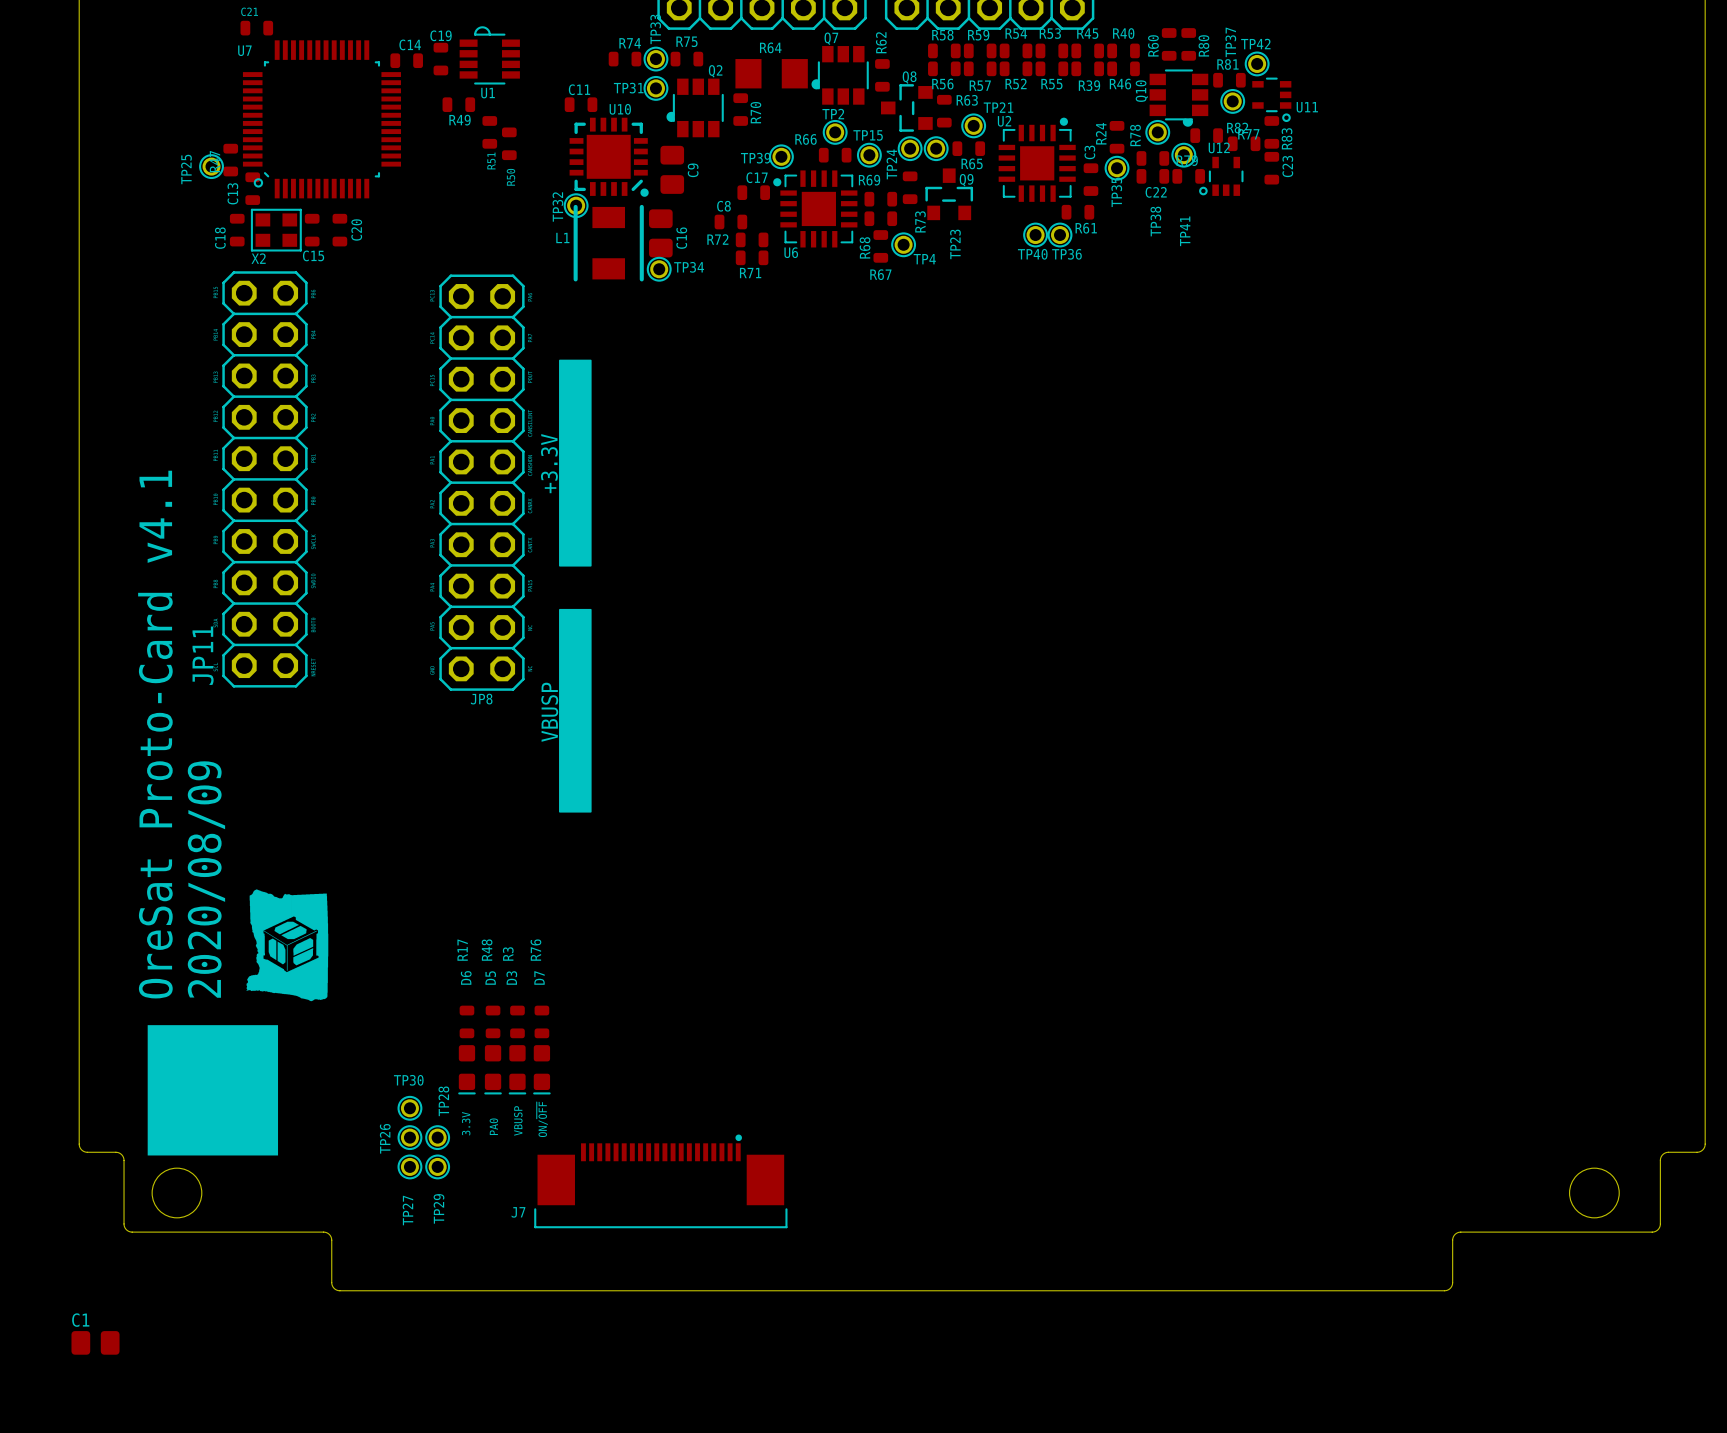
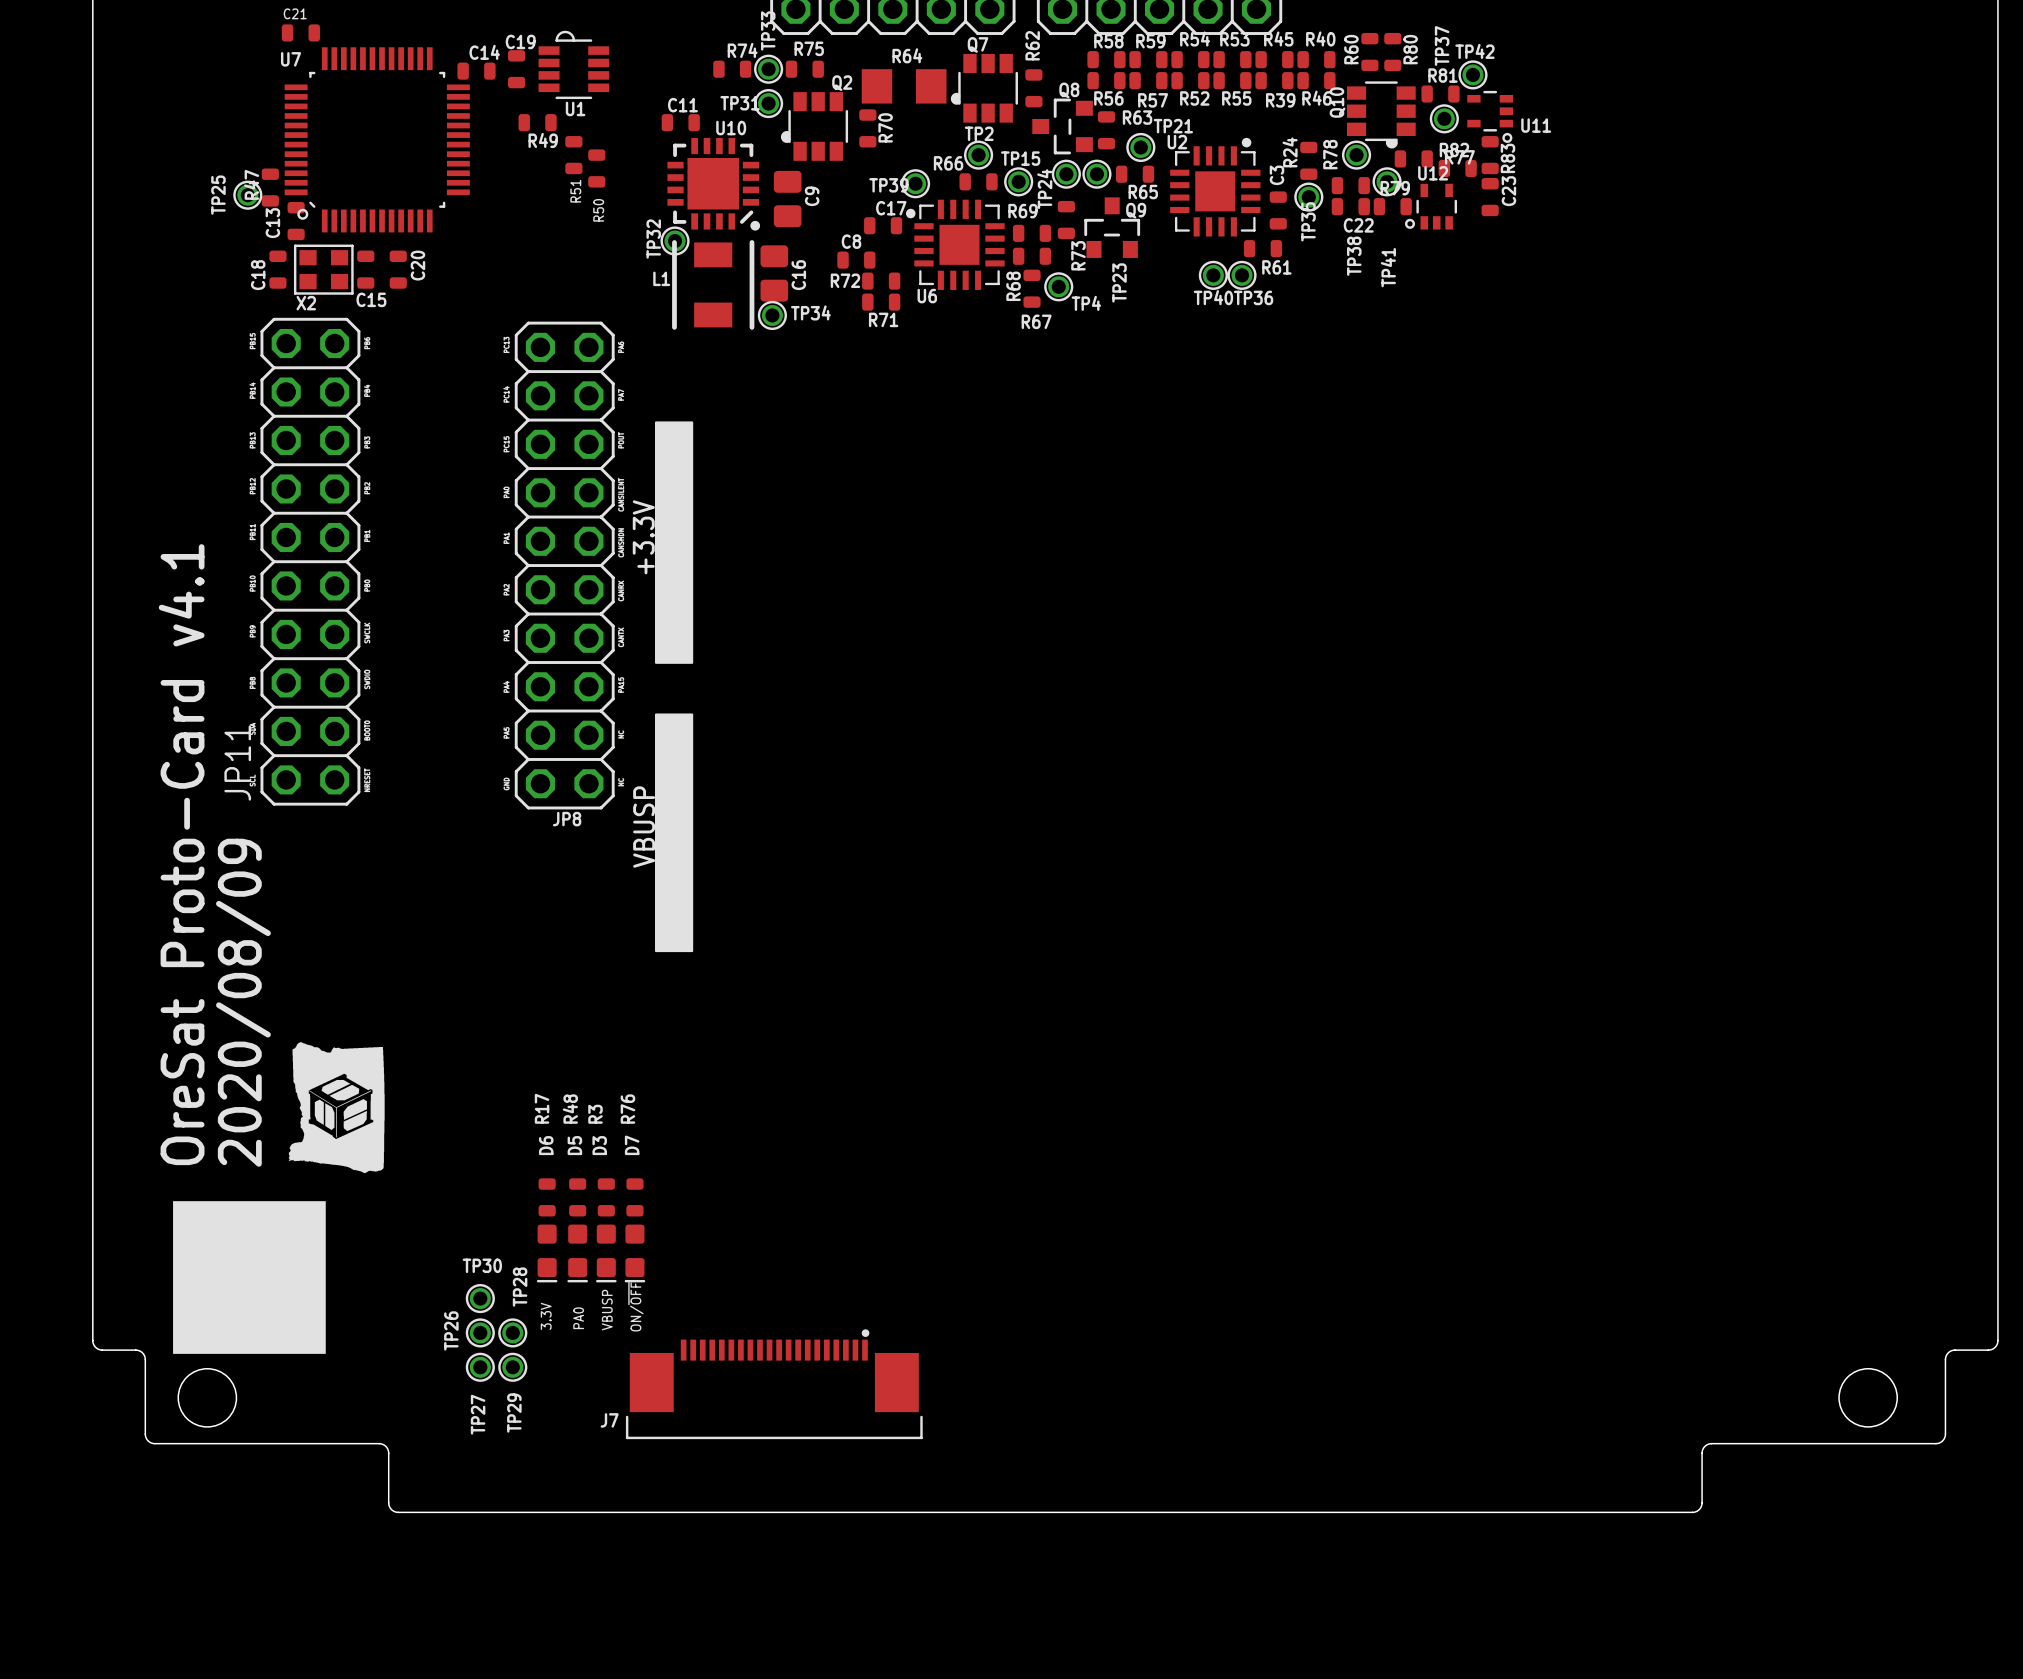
C1: (95, 1342) -> none

